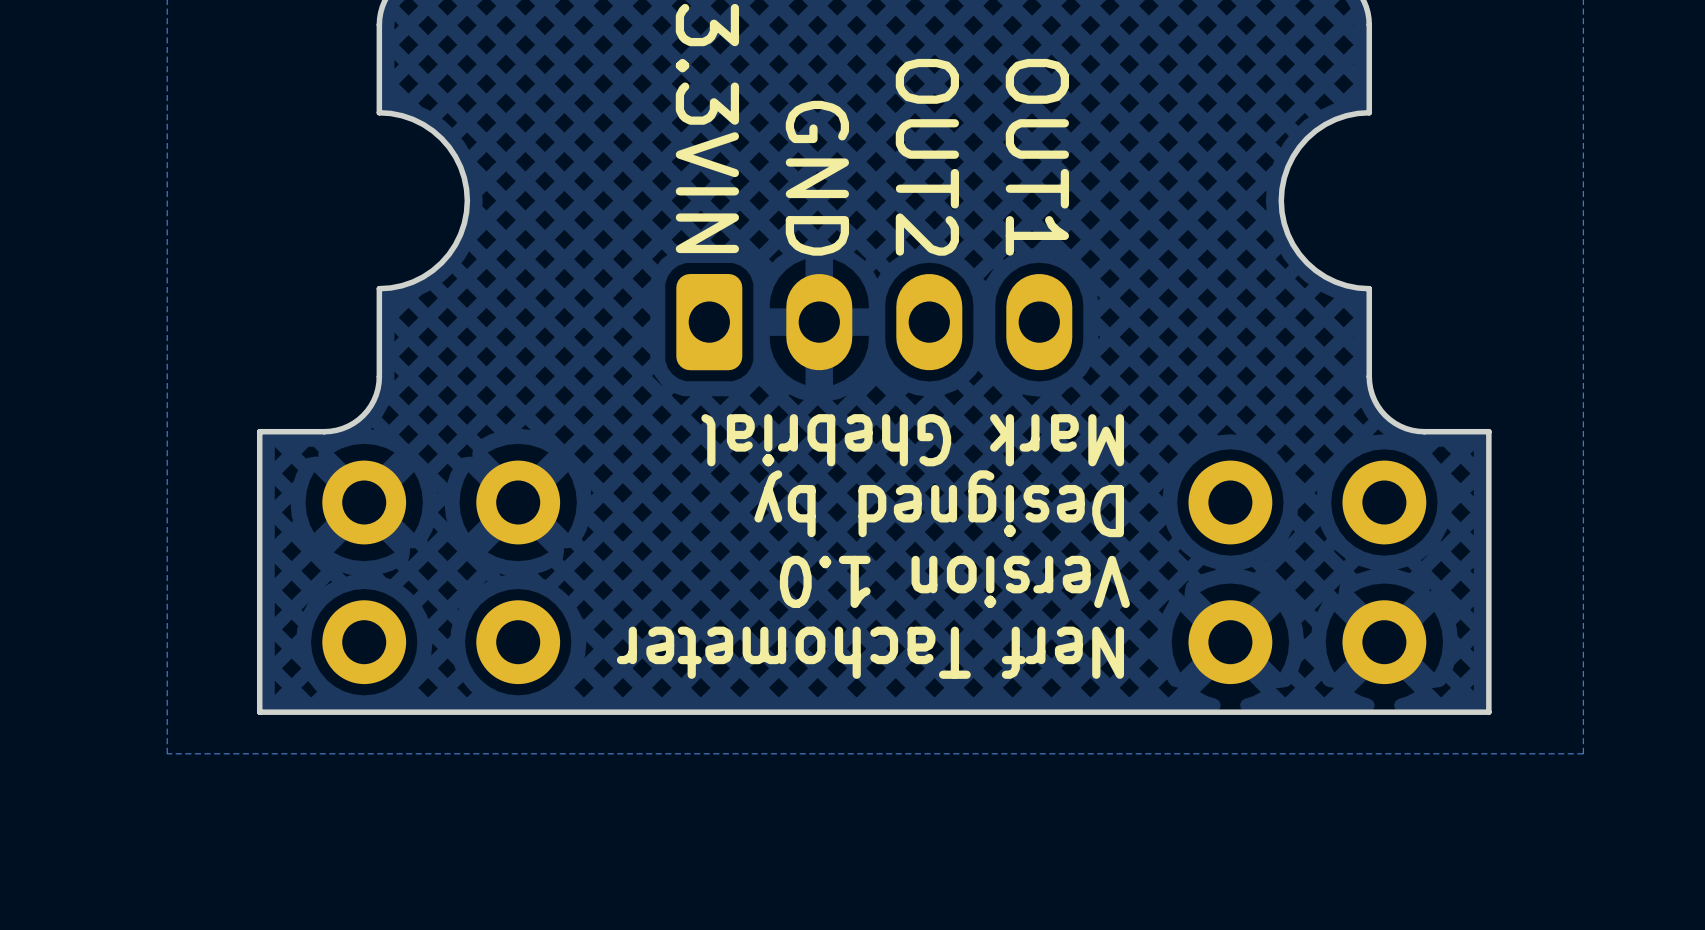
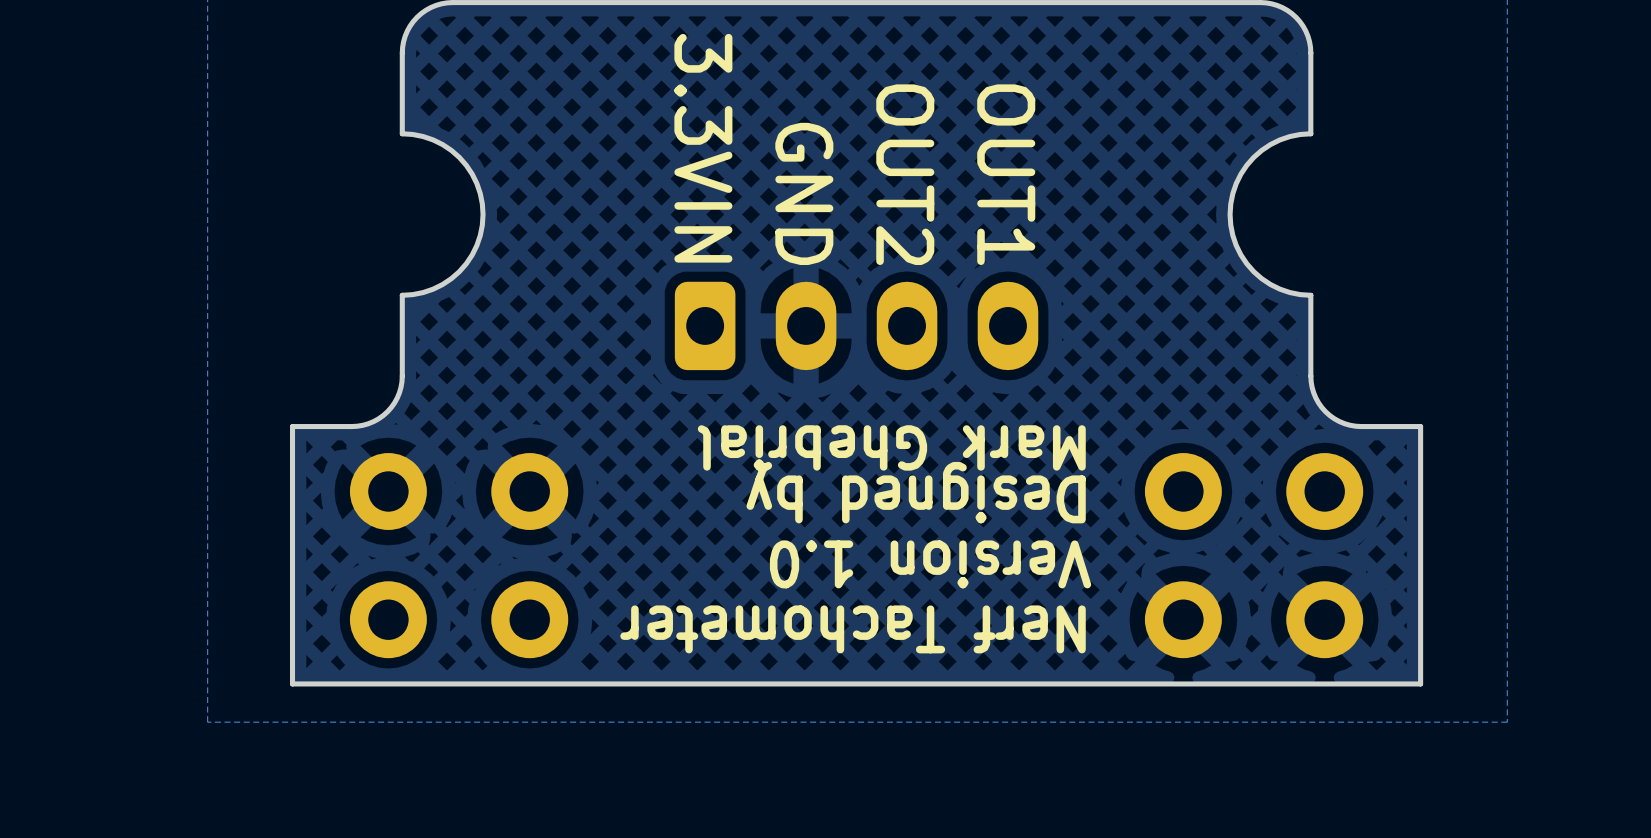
text position: Mark Ghebrial (912, 440) -> Mark Ghebrial (891, 447)

